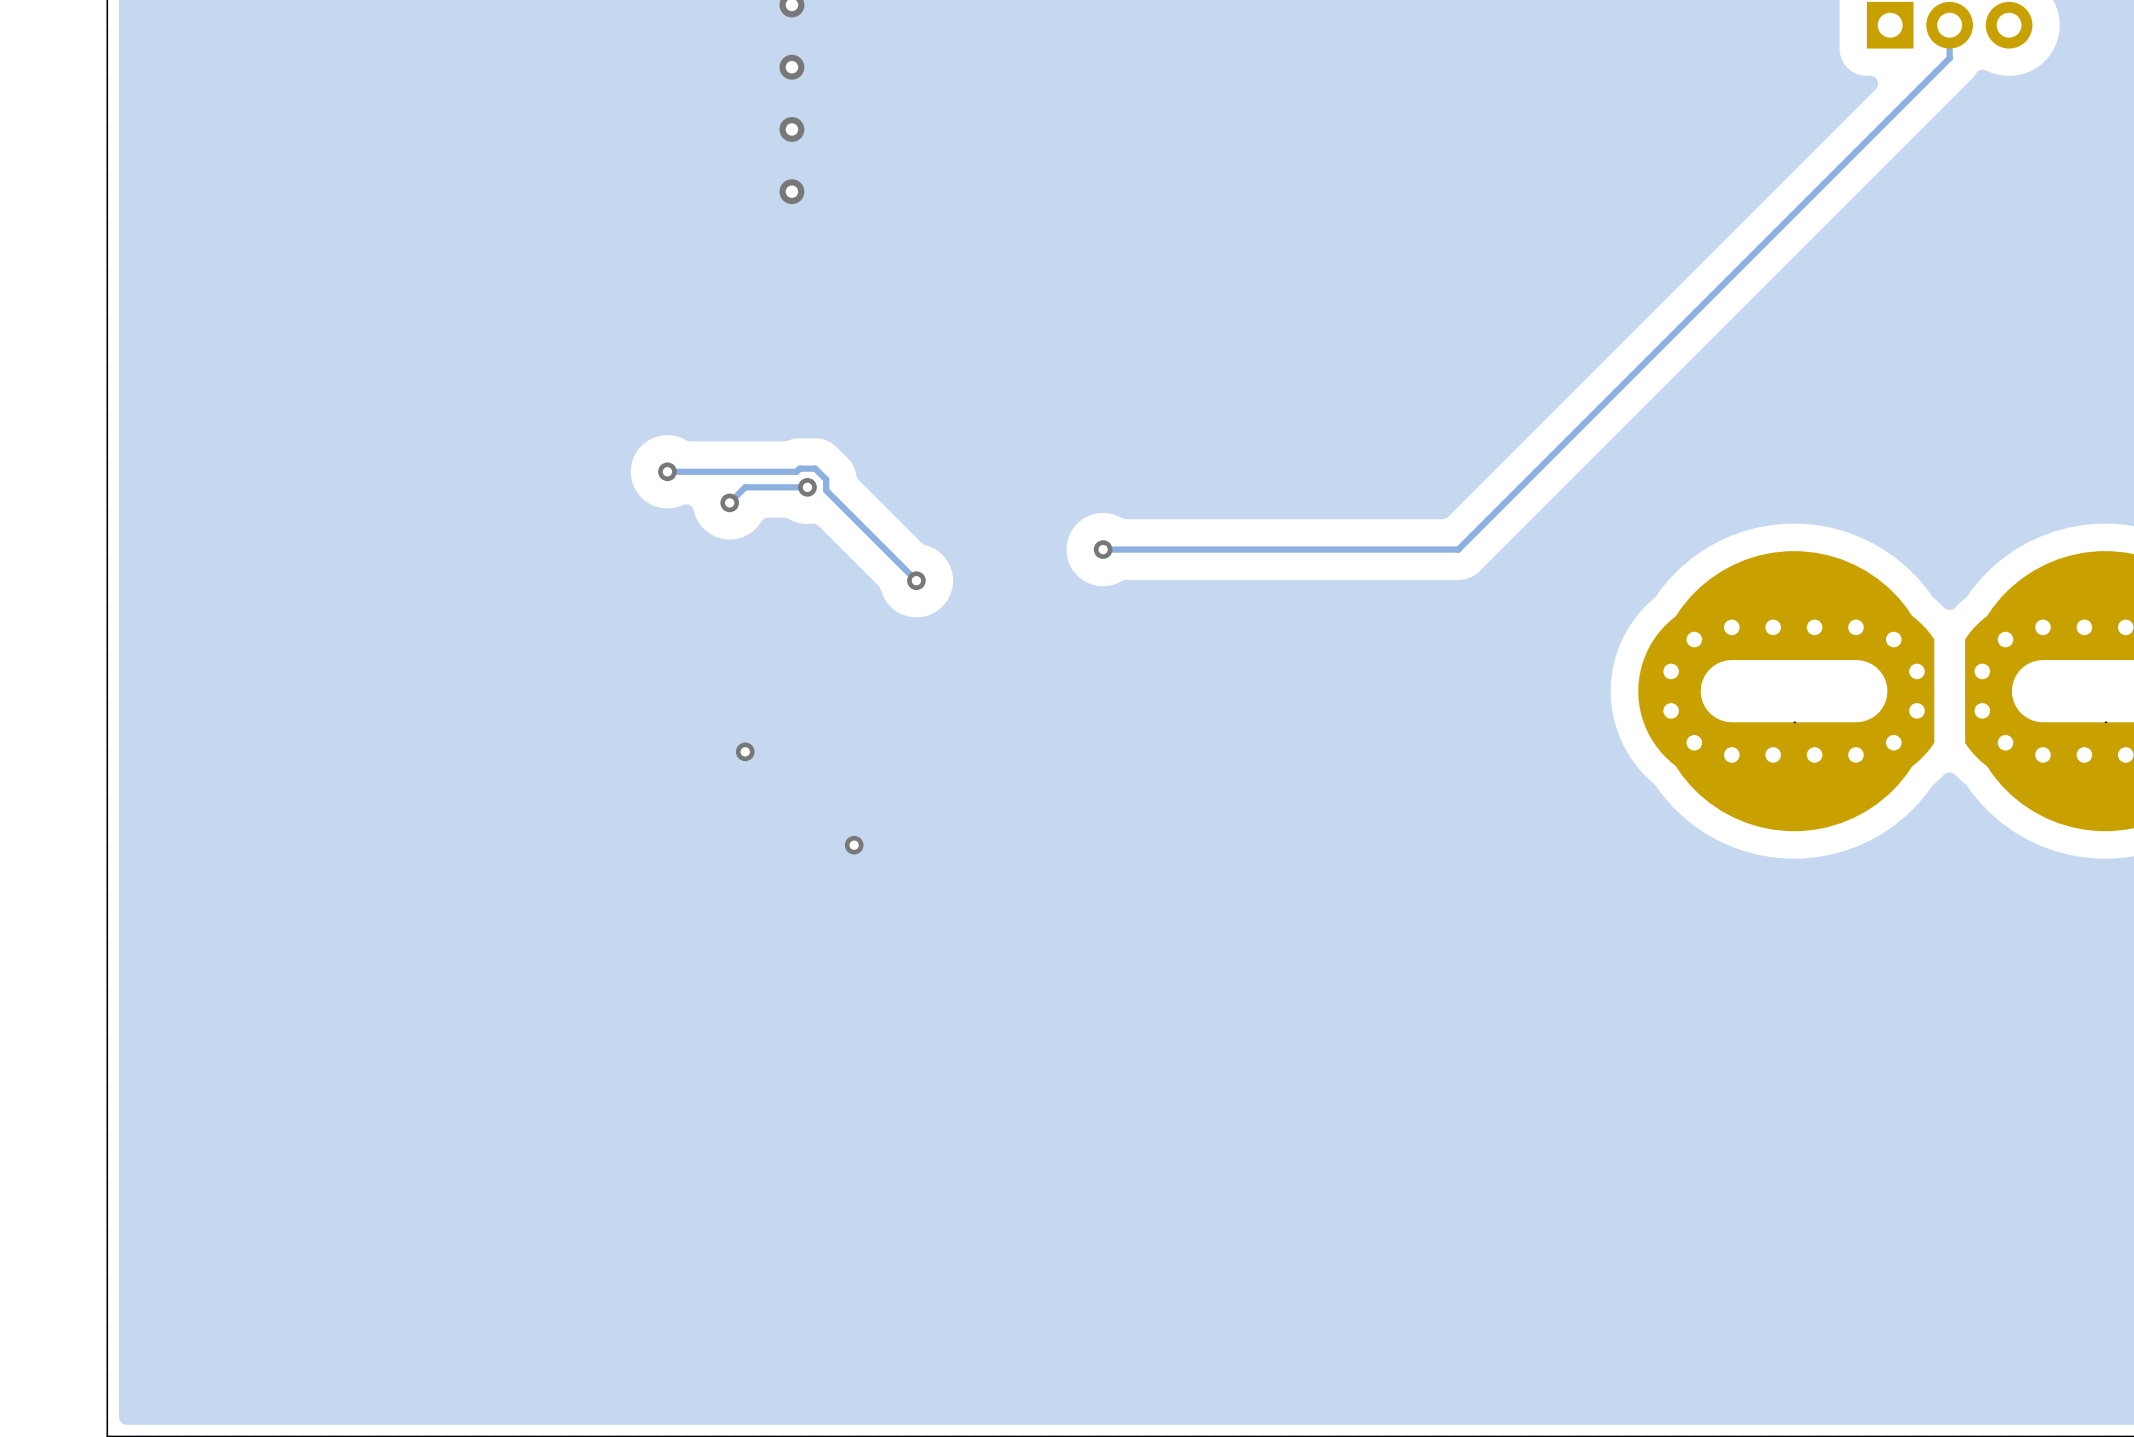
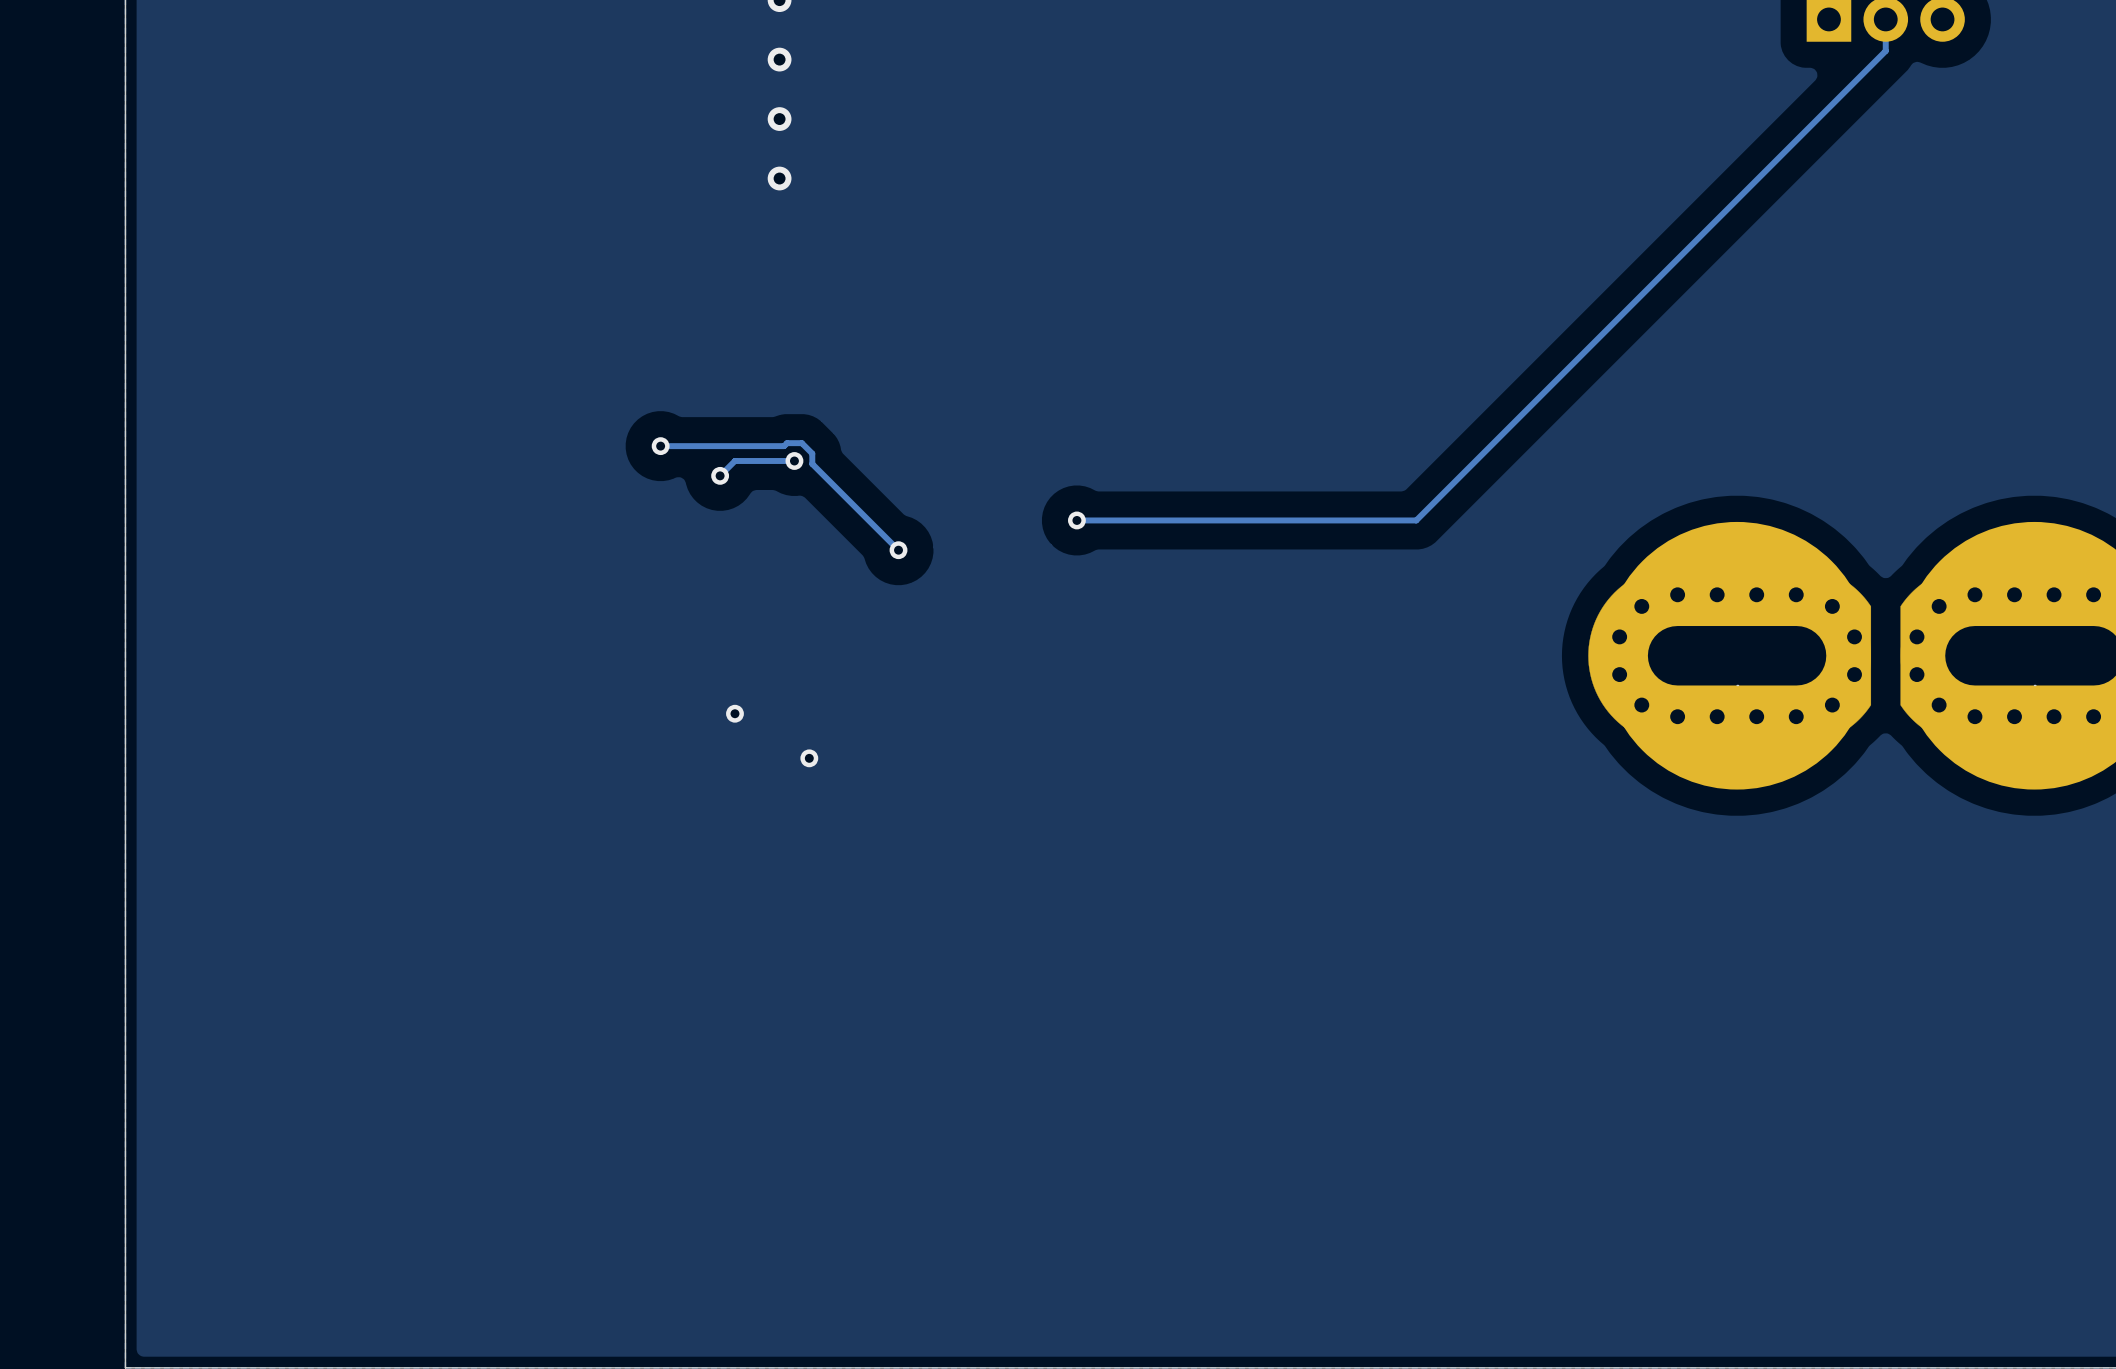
via position: (854, 845) -> (809, 758)

